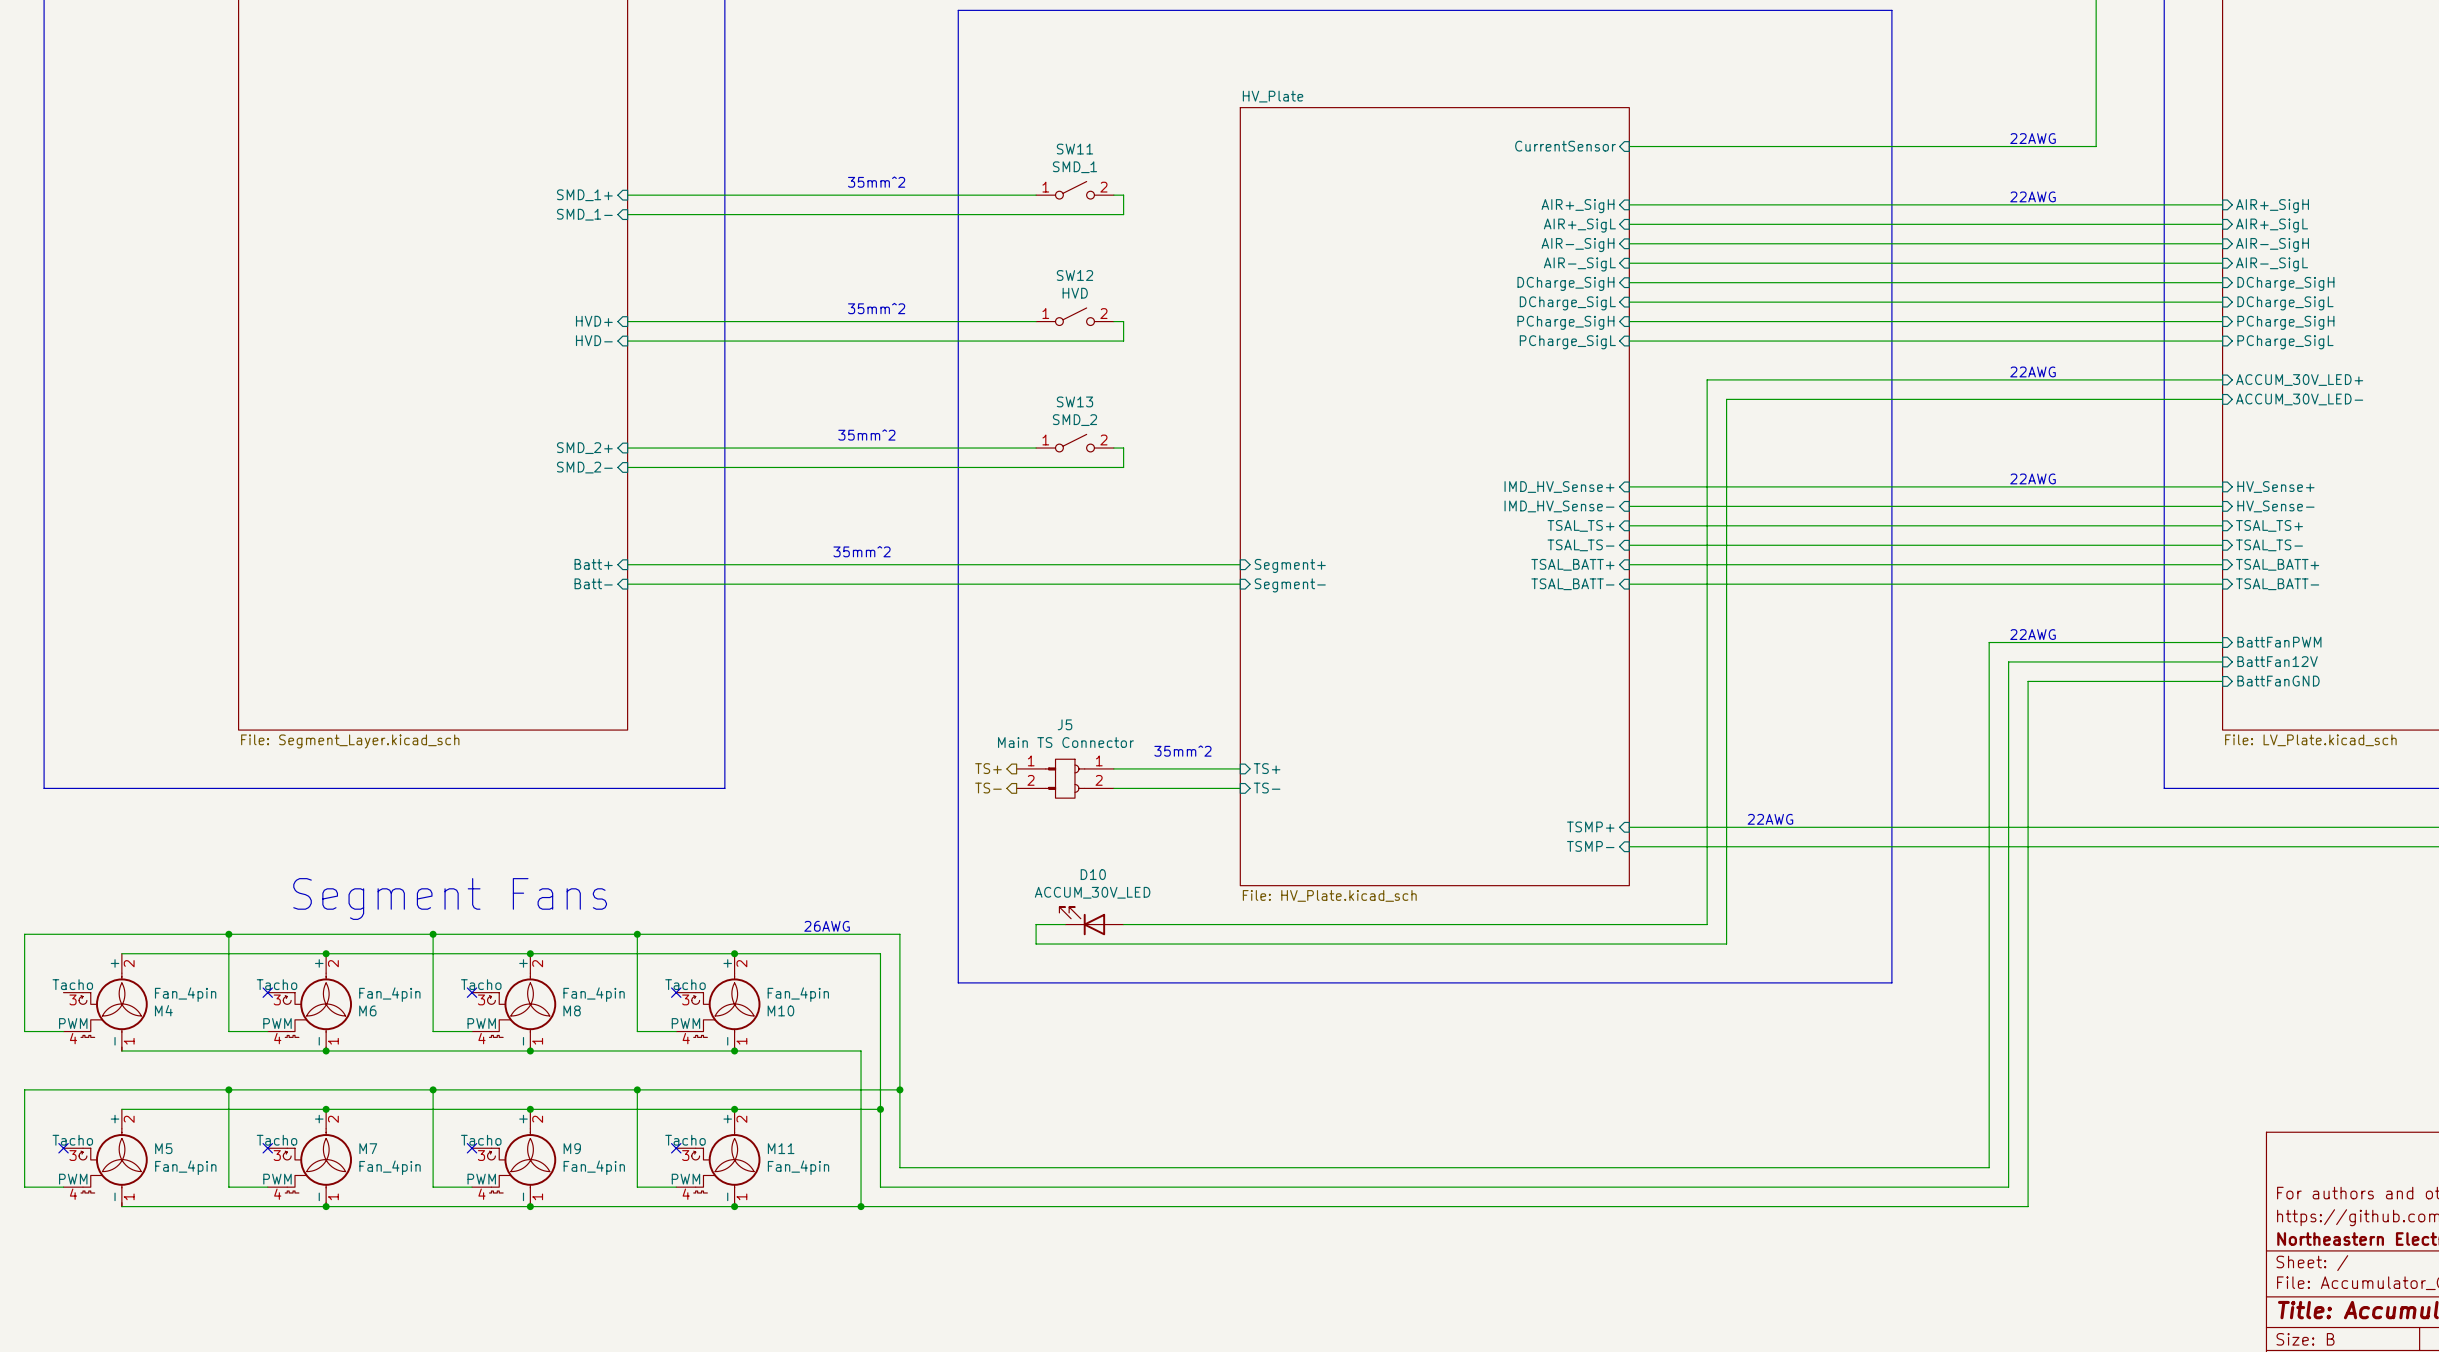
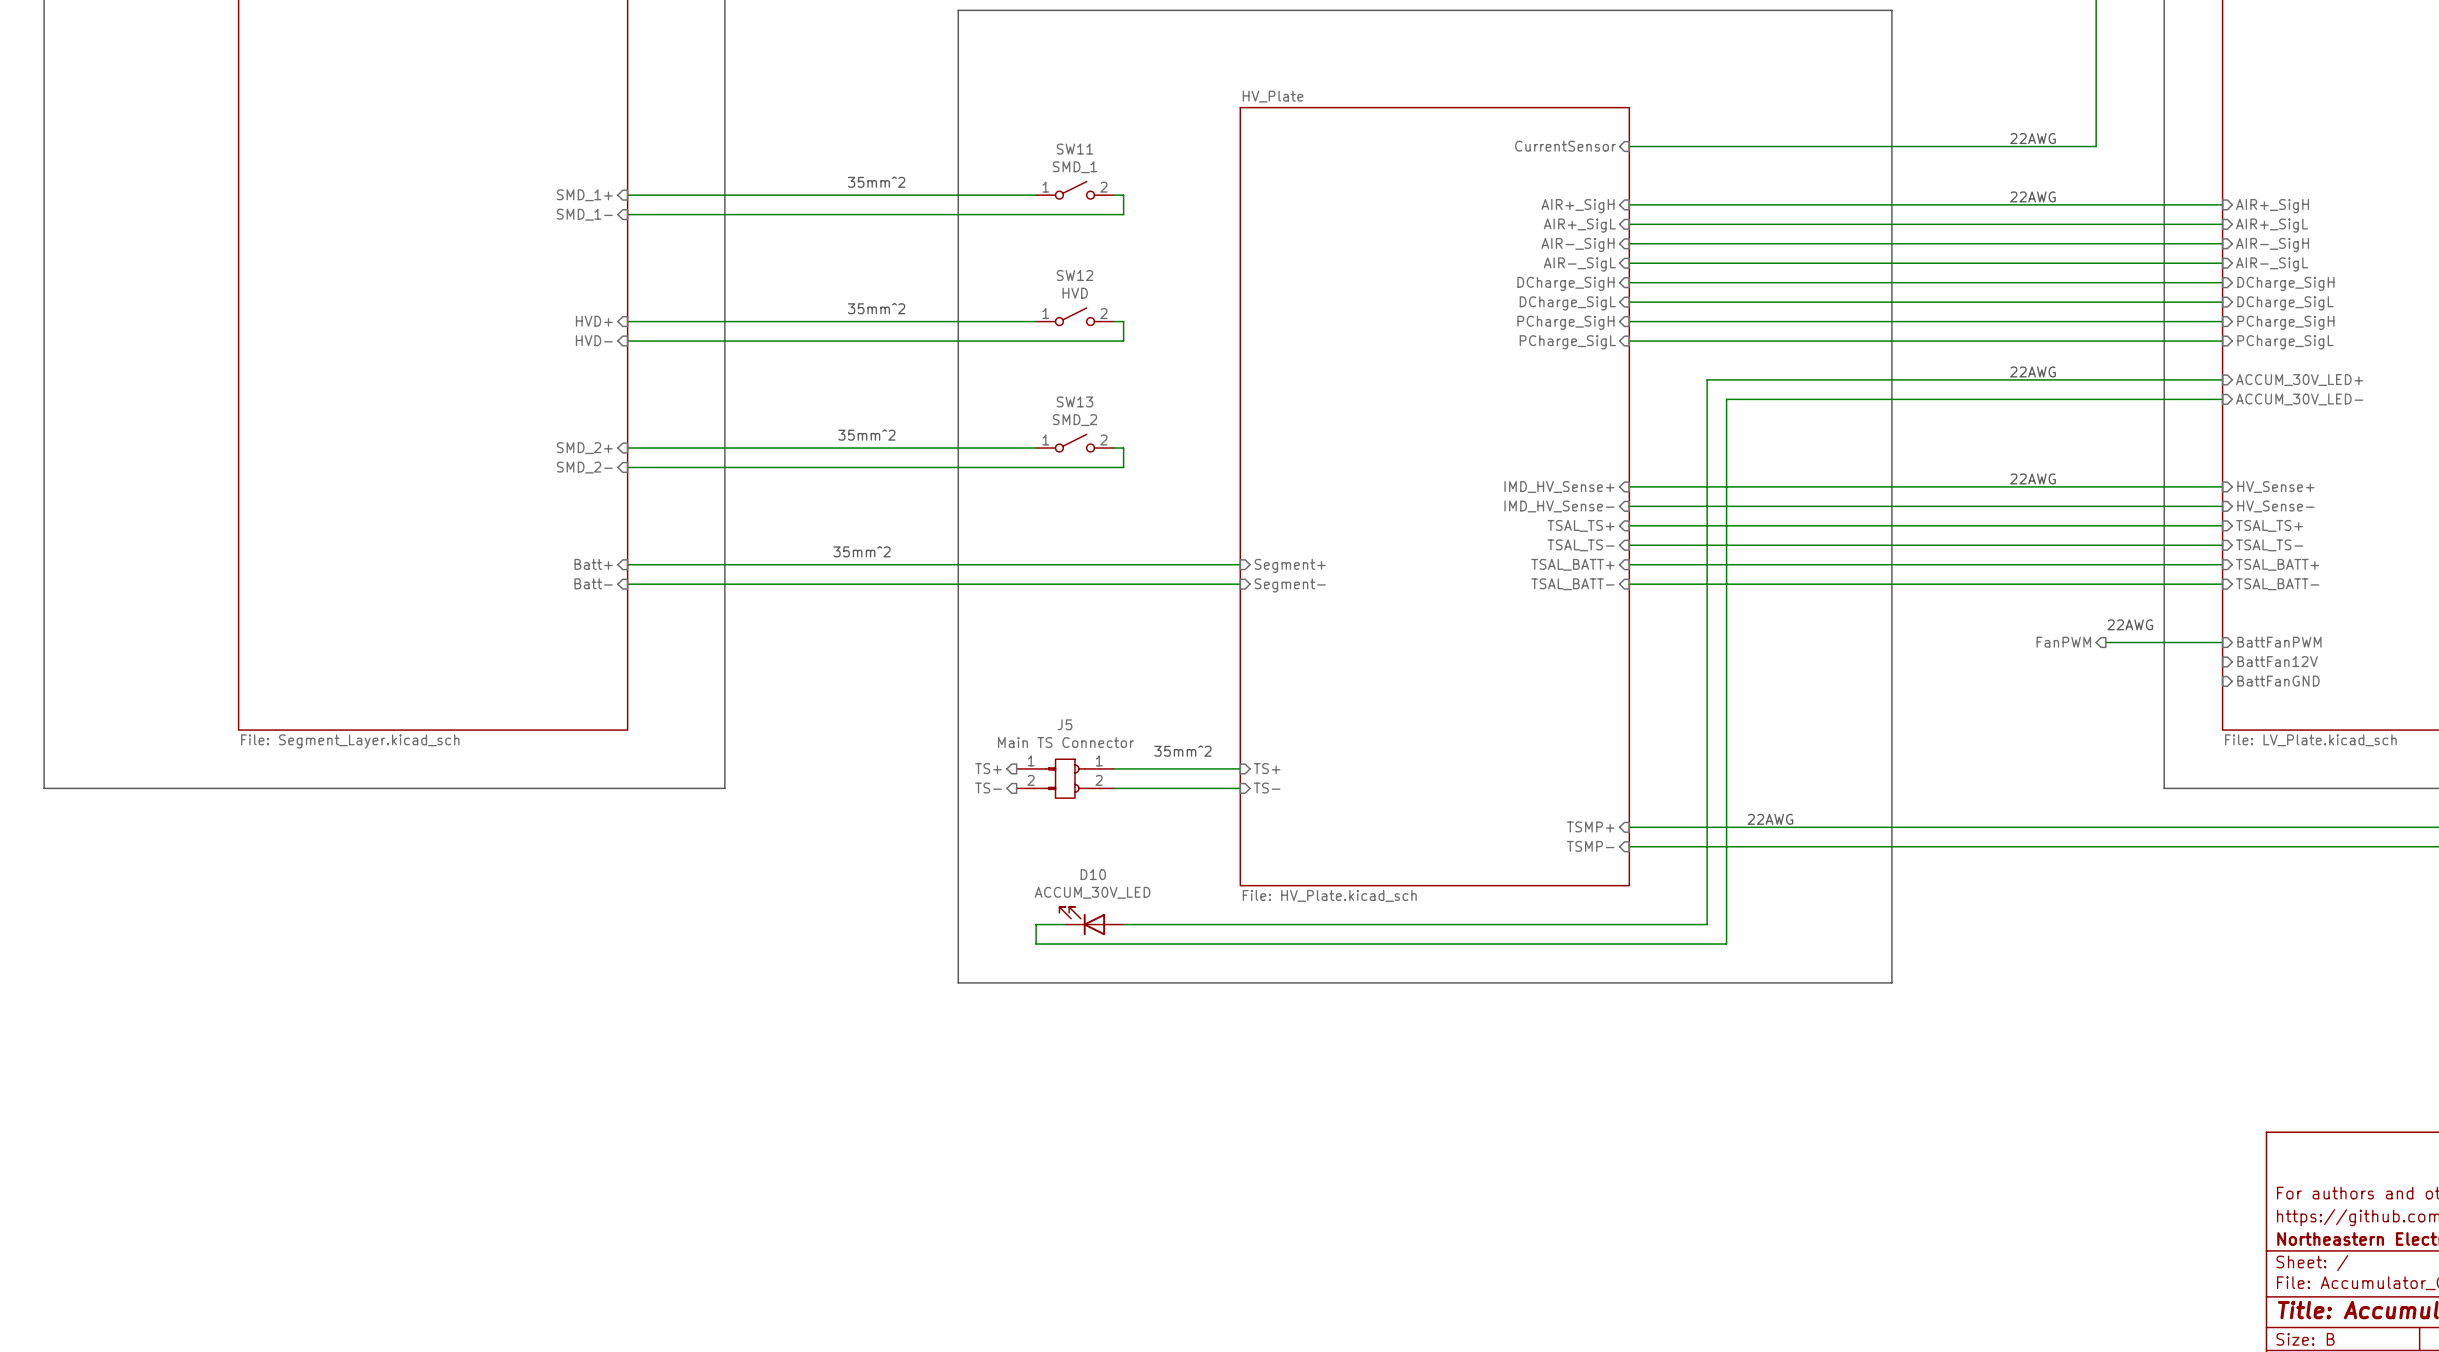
text position: 22AWG (2033, 634) -> 22AWG (2130, 624)
hierarchical label: none -> FanPWM (2063, 642)
wire: (2105, 642) (1989, 642) (1989, 1167) (899, 1167) (899, 934) (24, 934) (24, 1031) (63, 1031) -> none
wire: (2222, 661) (2008, 661) (2008, 1187) (880, 1187) (880, 953) (121, 953) -> none
wire: (2222, 681) (2028, 681) (2028, 1206) (121, 1206) -> none
text: Segment Fans (450, 899) -> none
text: 26AWG (827, 926) -> none
wire: (228, 934) (228, 1031) (267, 1031) -> none
junction: (228, 934) -> none
wire: (433, 934) (433, 1031) (472, 1031) -> none
junction: (433, 934) -> none
wire: (637, 934) (637, 1031) (676, 1031) -> none
junction: (637, 934) -> none
junction: (326, 953) -> none
junction: (530, 953) -> none
junction: (734, 953) -> none
no-connect mark: (267, 992) -> none
no-connect mark: (472, 992) -> none
no-connect mark: (676, 992) -> none
M4: Fan_4pin (105, 1002) -> none
M6: Fan_4pin (309, 1002) -> none
M8: Fan_4pin (514, 1002) -> none
M10: Fan_4pin (718, 1002) -> none
wire: (121, 1050) (861, 1050) (861, 1206) -> none
junction: (326, 1050) -> none
junction: (530, 1050) -> none
junction: (734, 1050) -> none
wire: (228, 1089) (228, 1187) (267, 1187) -> none
junction: (228, 1089) -> none
wire: (433, 1089) (433, 1187) (472, 1187) -> none
junction: (433, 1089) -> none
wire: (637, 1089) (637, 1187) (676, 1187) -> none
junction: (637, 1089) -> none
wire: (899, 1089) (24, 1089) (24, 1187) (63, 1187) -> none
junction: (899, 1089) -> none
wire: (121, 1109) (880, 1109) -> none
junction: (326, 1109) -> none
junction: (530, 1109) -> none
junction: (734, 1109) -> none
junction: (880, 1109) -> none
no-connect mark: (63, 1148) -> none
no-connect mark: (267, 1148) -> none
no-connect mark: (472, 1148) -> none
no-connect mark: (676, 1148) -> none
M5: Fan_4pin (105, 1157) -> none
M7: Fan_4pin (309, 1157) -> none
M9: Fan_4pin (514, 1157) -> none
M11: Fan_4pin (718, 1157) -> none
junction: (326, 1206) -> none
junction: (530, 1206) -> none
junction: (734, 1206) -> none
junction: (861, 1206) -> none

